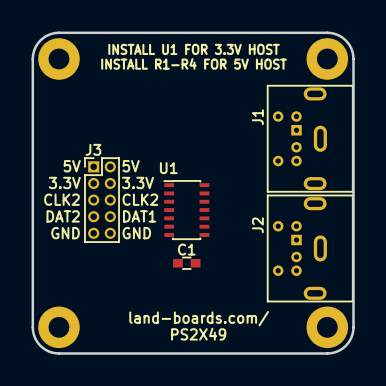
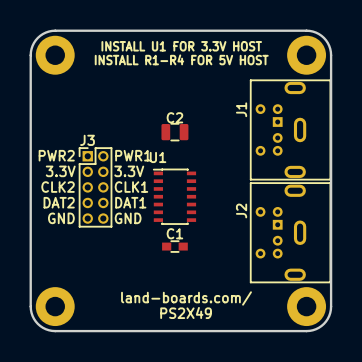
C2: none -> (174, 132)
text: 5V (72, 166) -> PWR2 (56, 155)
text: 5V (131, 166) -> PWR1 (133, 155)
text: CLK2 (140, 199) -> CLK1 (131, 187)

